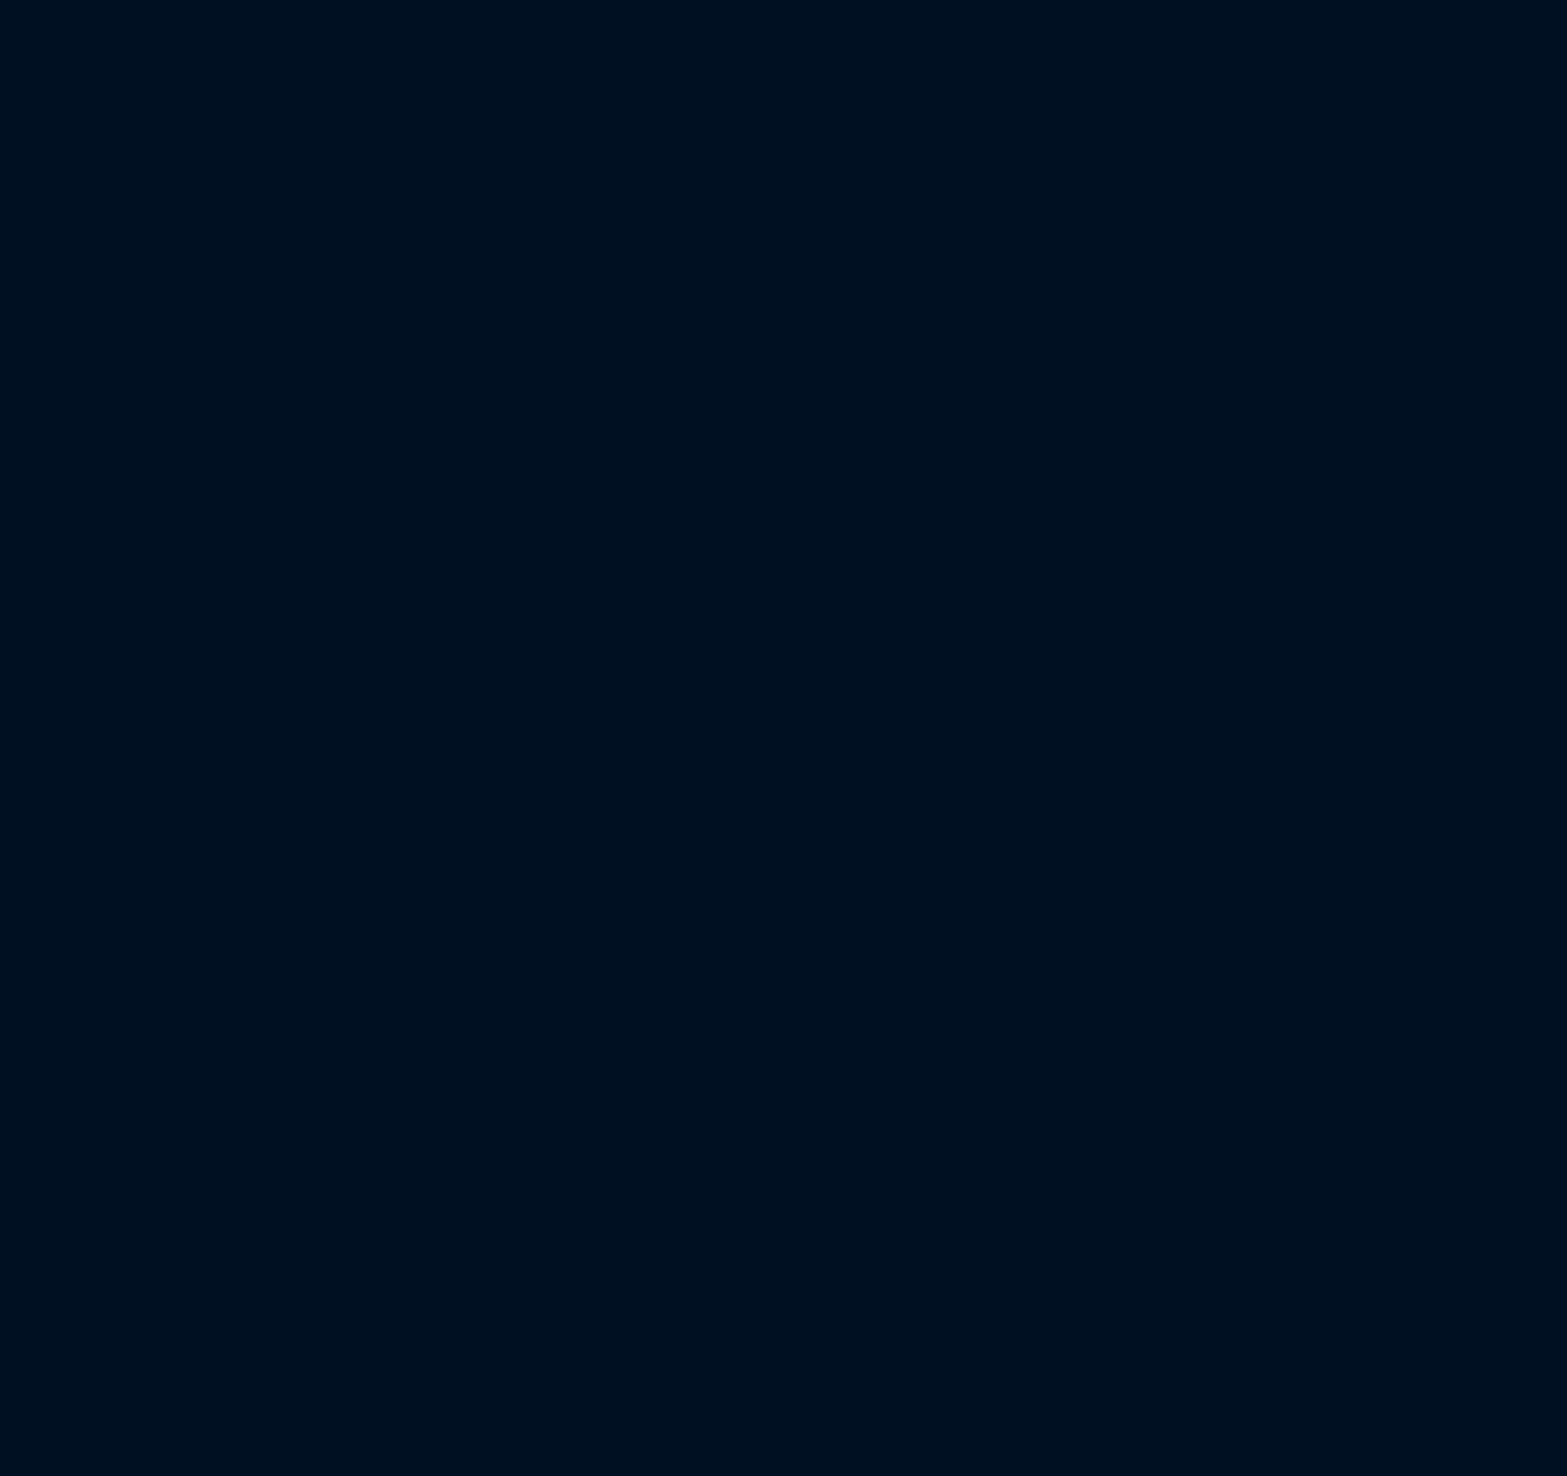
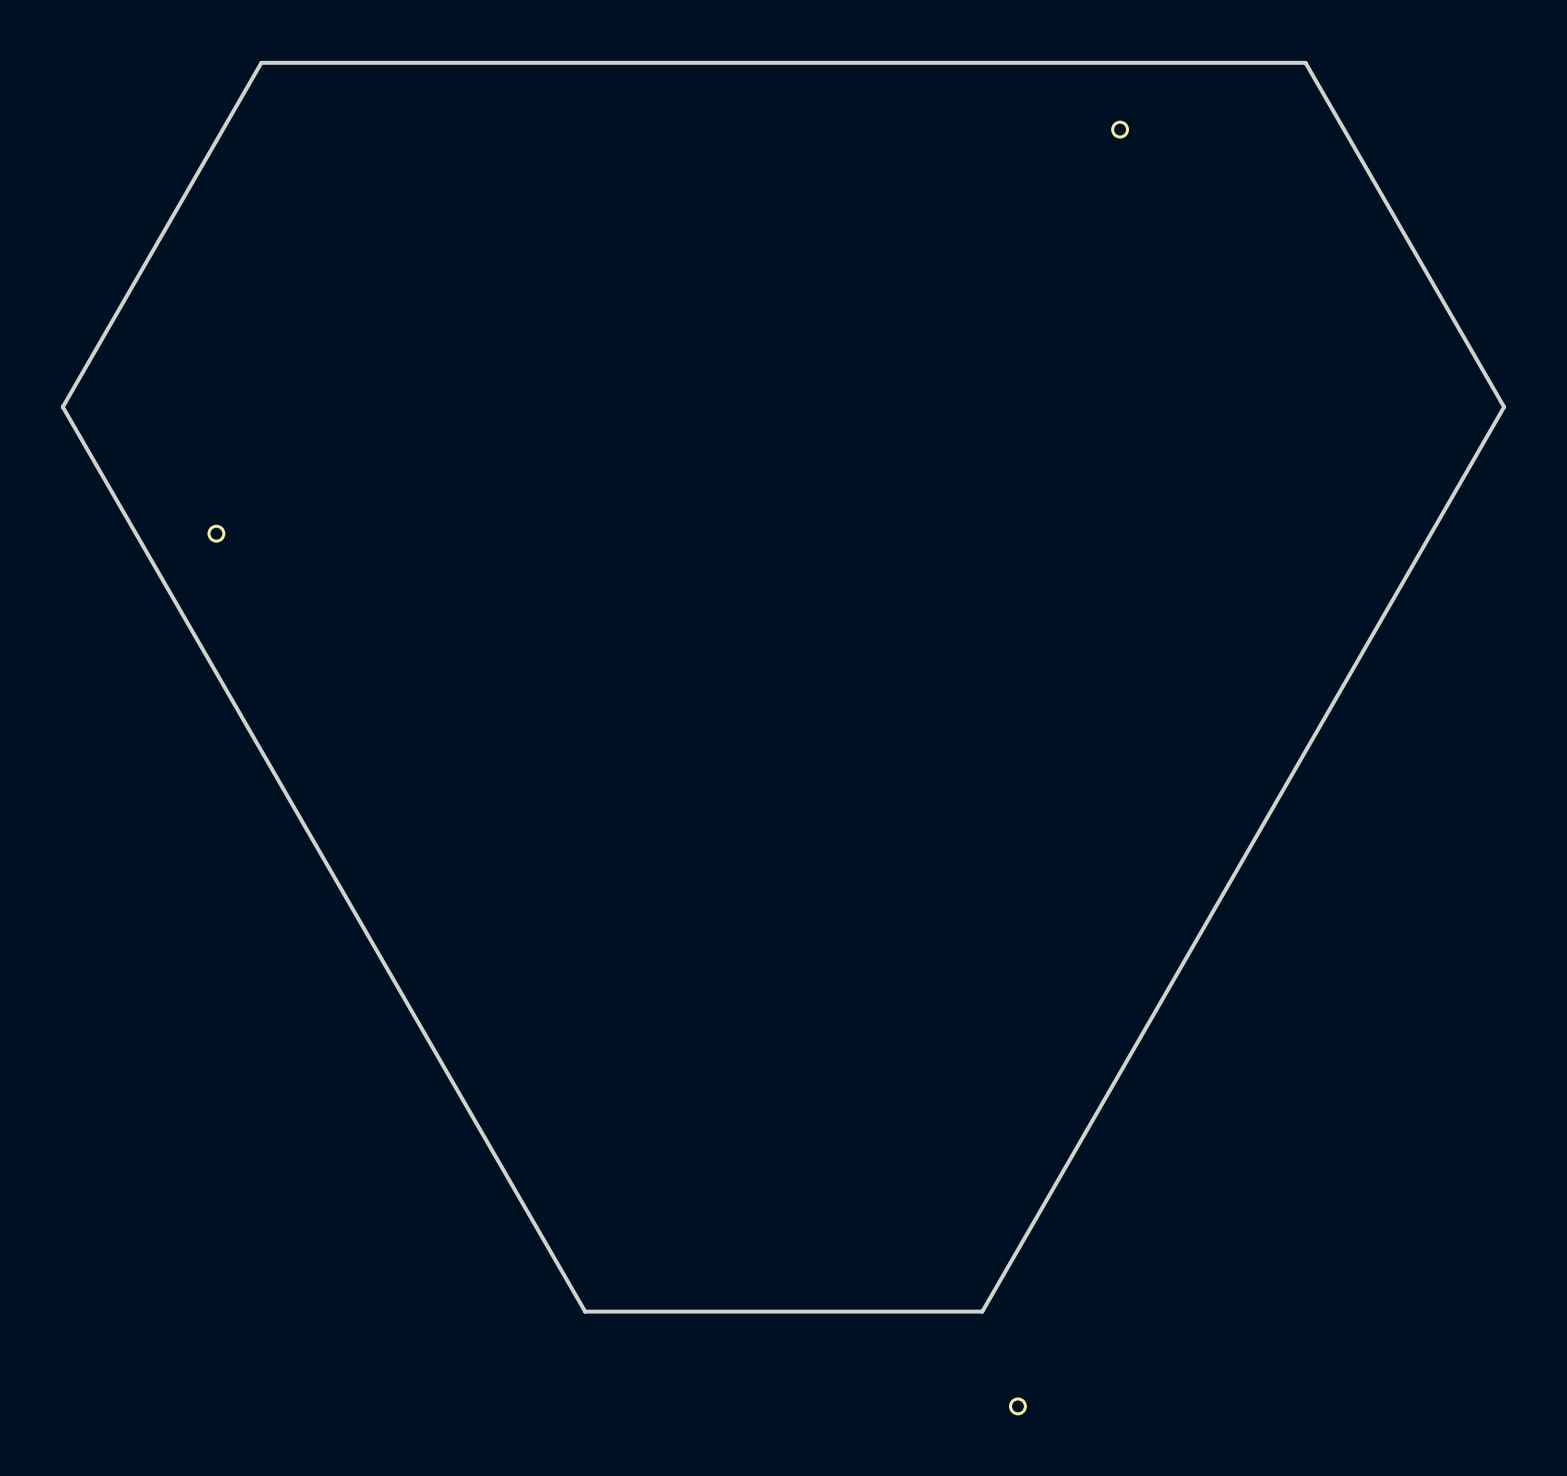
board edge: none -> (1305, 62) (1504, 407) (982, 1311) (585, 1311) (62, 407) (261, 62) (1305, 62)
part: none -> (1120, 129)
part: none -> (216, 533)
part: none -> (1017, 1406)

